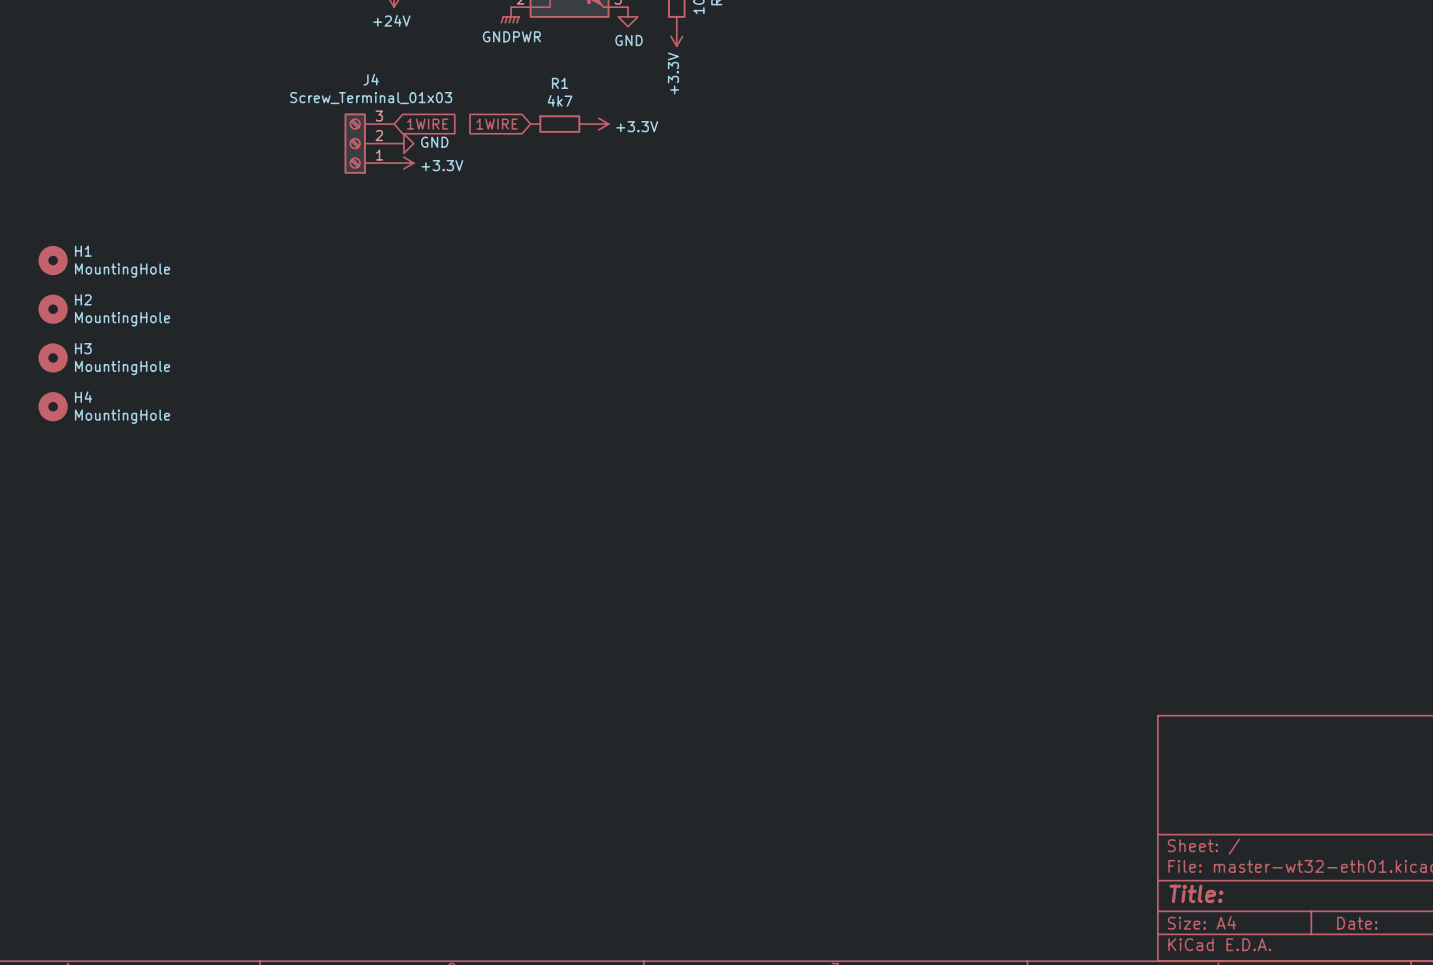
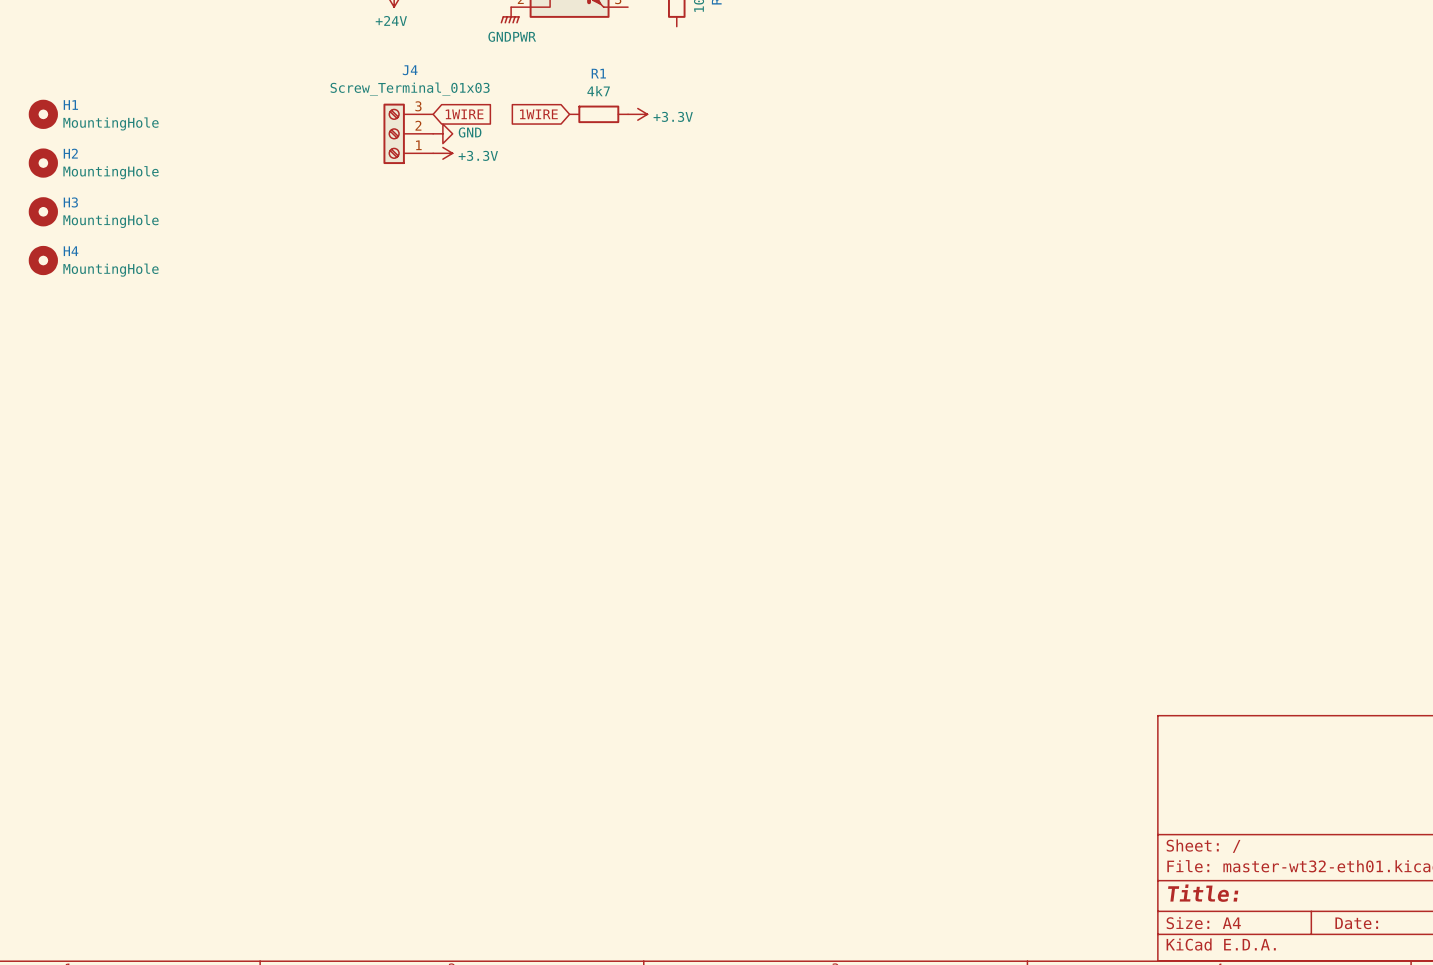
power symbol: GND (628, 16) -> none
power symbol: +3.3V (676, 36) -> none
global label position: 1WIRE (427, 124) -> 1WIRE (464, 114)
global label position: 1WIRE (497, 124) -> 1WIRE (538, 114)
R1 position: (559, 124) -> (598, 114)
power symbol position: +3.3V (598, 124) -> +3.3V (637, 114)
J4 position: (369, 143) -> (408, 133)
power symbol position: GND (403, 143) -> GND (442, 133)
power symbol position: +3.3V (403, 163) -> +3.3V (442, 153)
H1 position: (53, 260) -> (43, 114)
H2 position: (53, 309) -> (43, 163)
H3 position: (53, 357) -> (43, 211)
H4 position: (53, 406) -> (43, 260)

